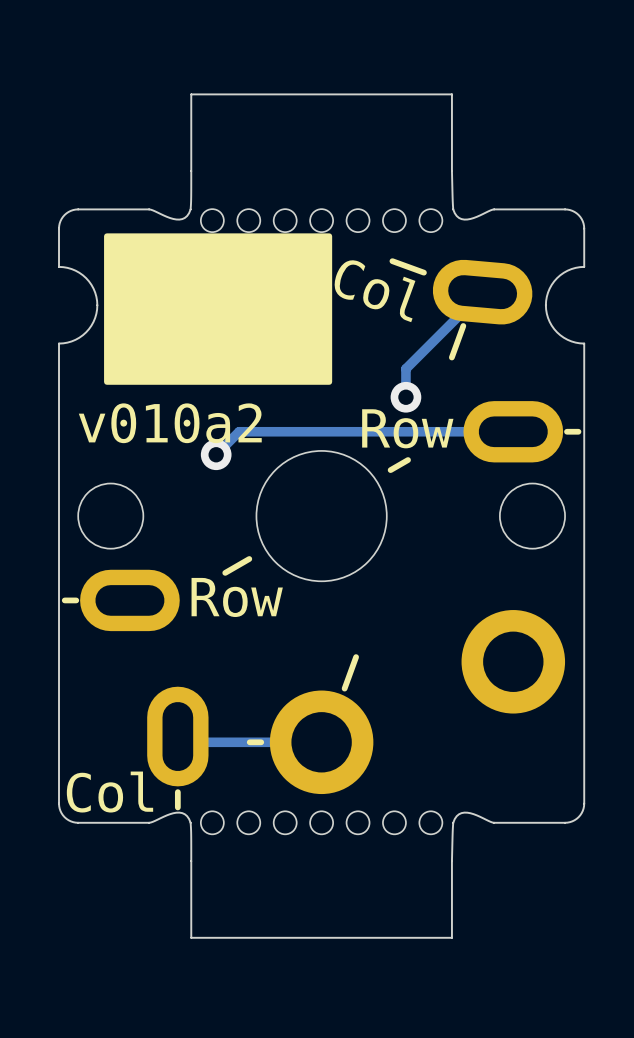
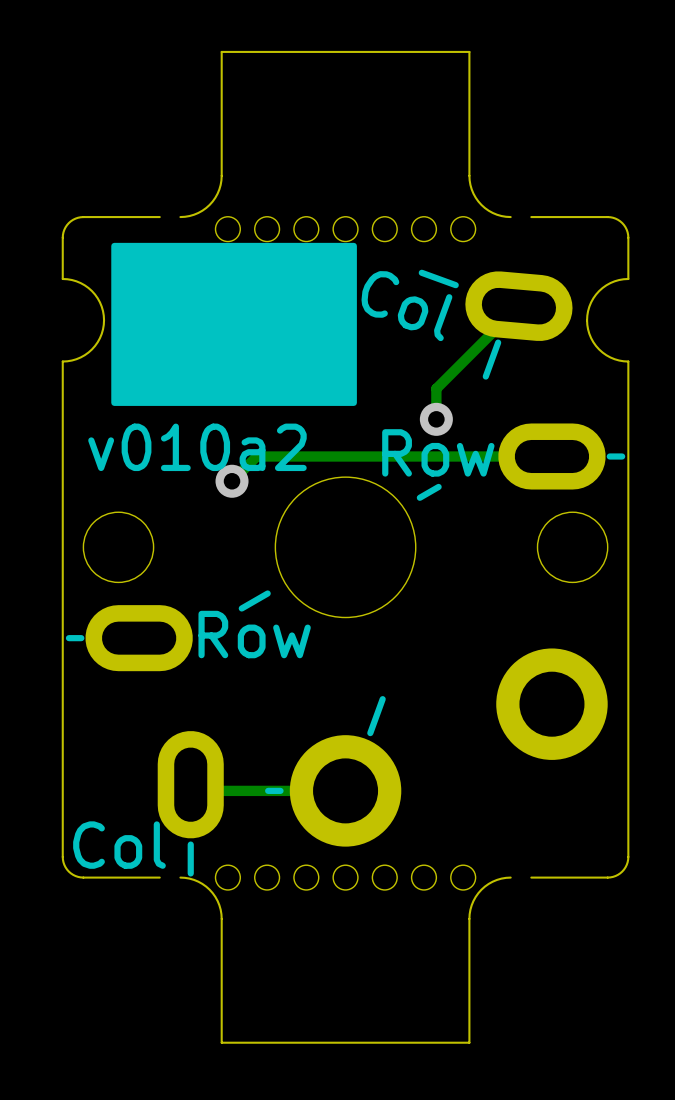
board edge: none -> (510, 217) (497, 214) (484, 208) (475, 197) (470, 184) (469, 51) (221, 51) (220, 184) (215, 197) (206, 208) (194, 214) (180, 217)
board edge: (494, 209) (473, 218) (464, 219) (456, 216) (453, 209) (451, 94) (191, 94) (190, 209) (187, 216) (179, 219) (149, 209) -> none
line: none -> (190, 861) (190, 873)
board edge: none -> (510, 877) (497, 879) (484, 886) (475, 896) (470, 909) (469, 1042) (221, 1042) (220, 909) (215, 896) (206, 886) (194, 879) (180, 877)
board edge: (494, 822) (473, 814) (464, 812) (456, 816) (453, 822) (451, 937) (191, 937) (190, 822) (187, 816) (179, 812) (149, 822) -> none

